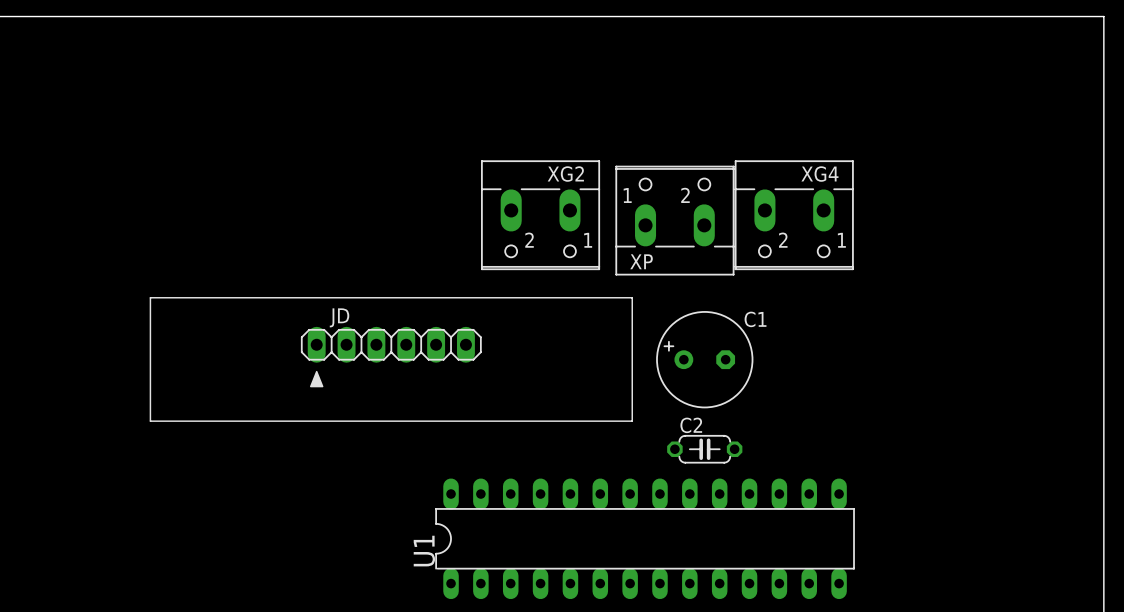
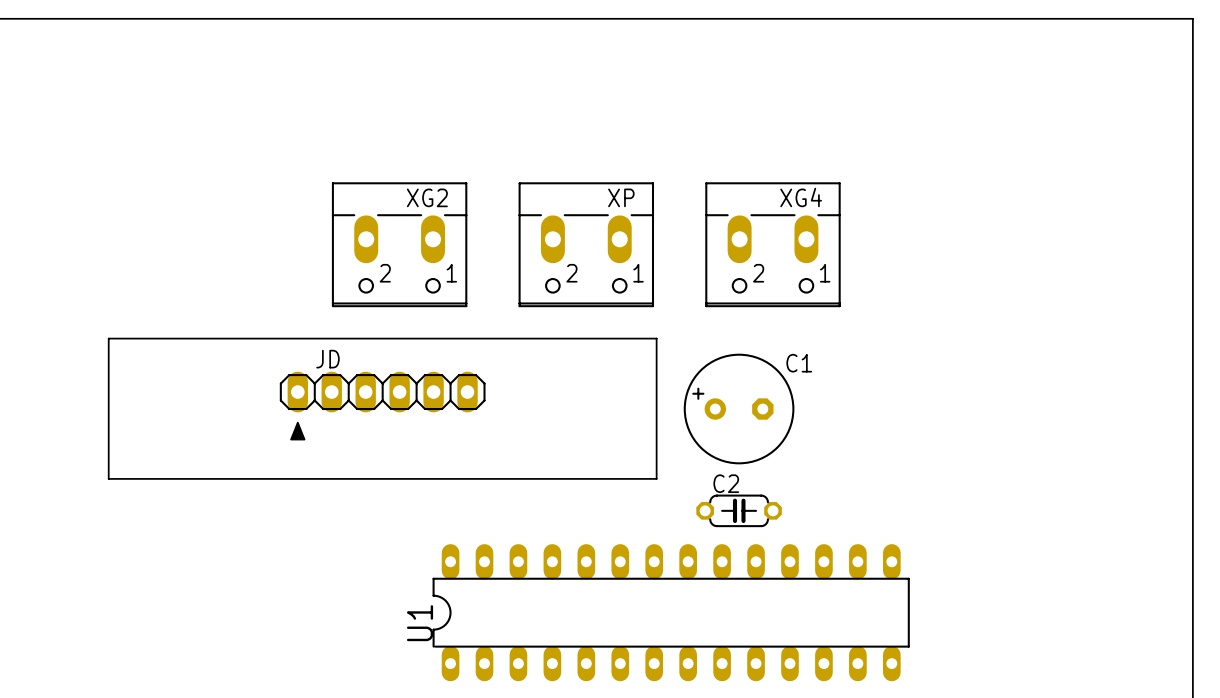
XG2 position: (540, 215) -> (399, 244)
XP: none -> (586, 244)
XG4 position: (794, 215) -> (772, 244)
XP: (674, 220) -> none

